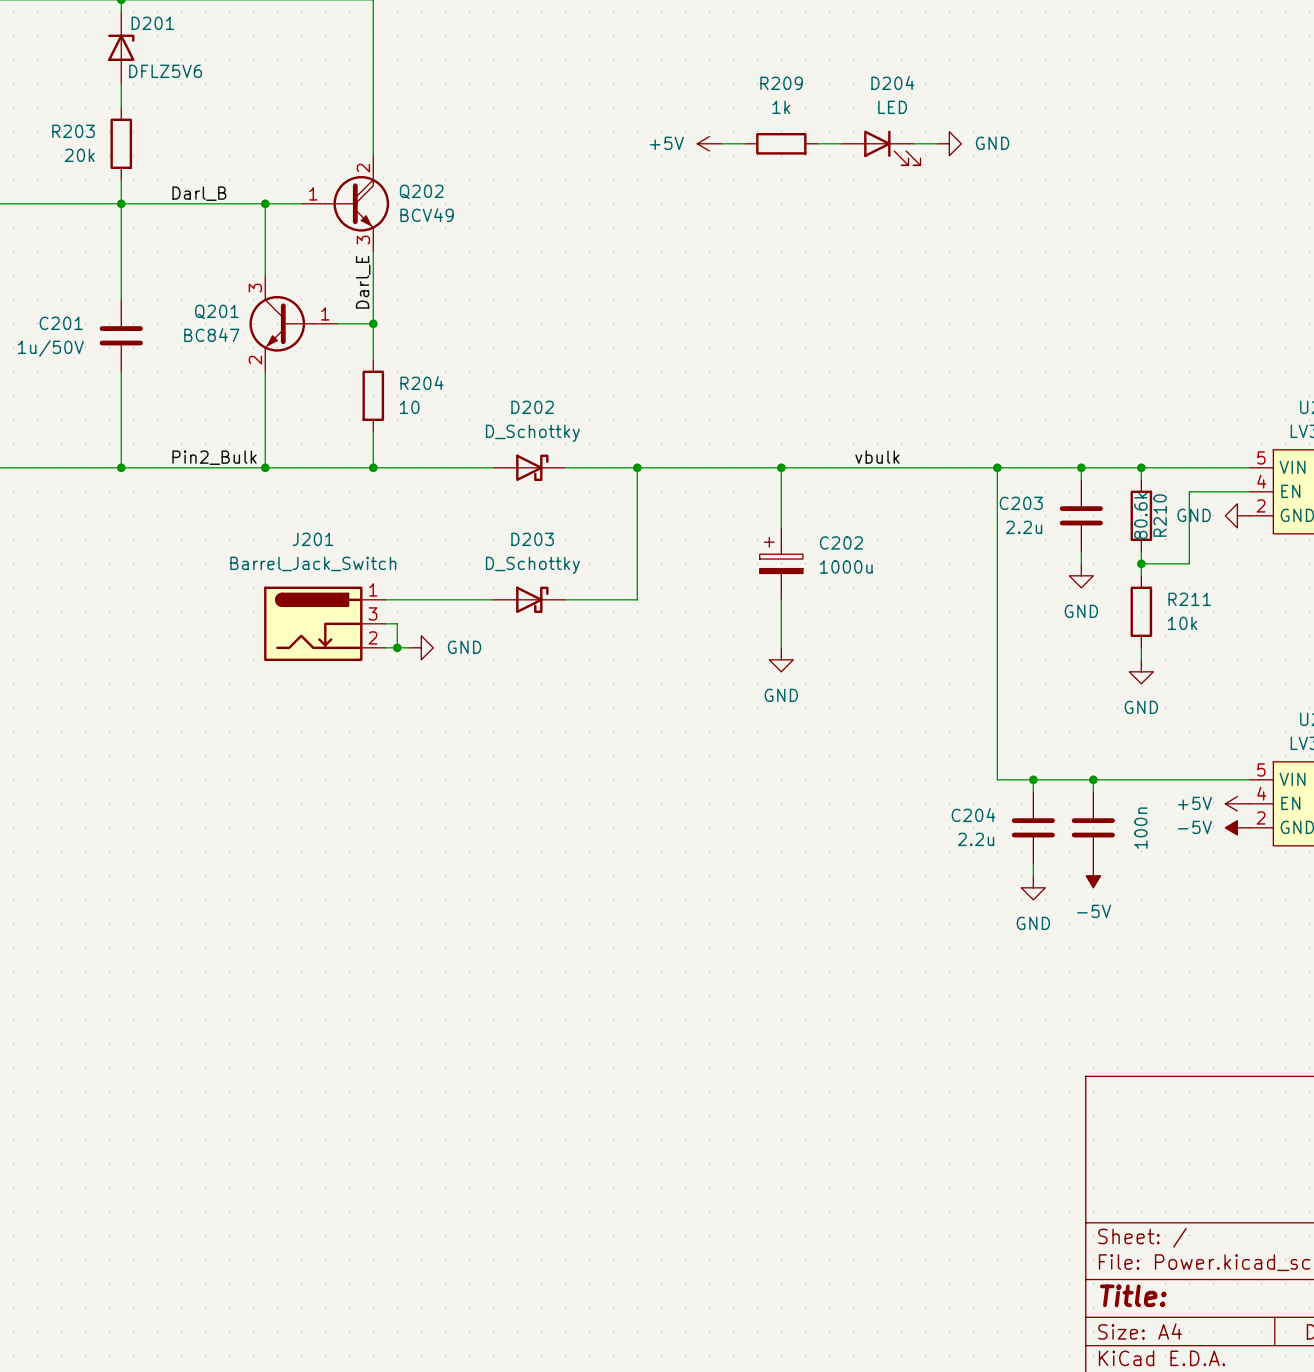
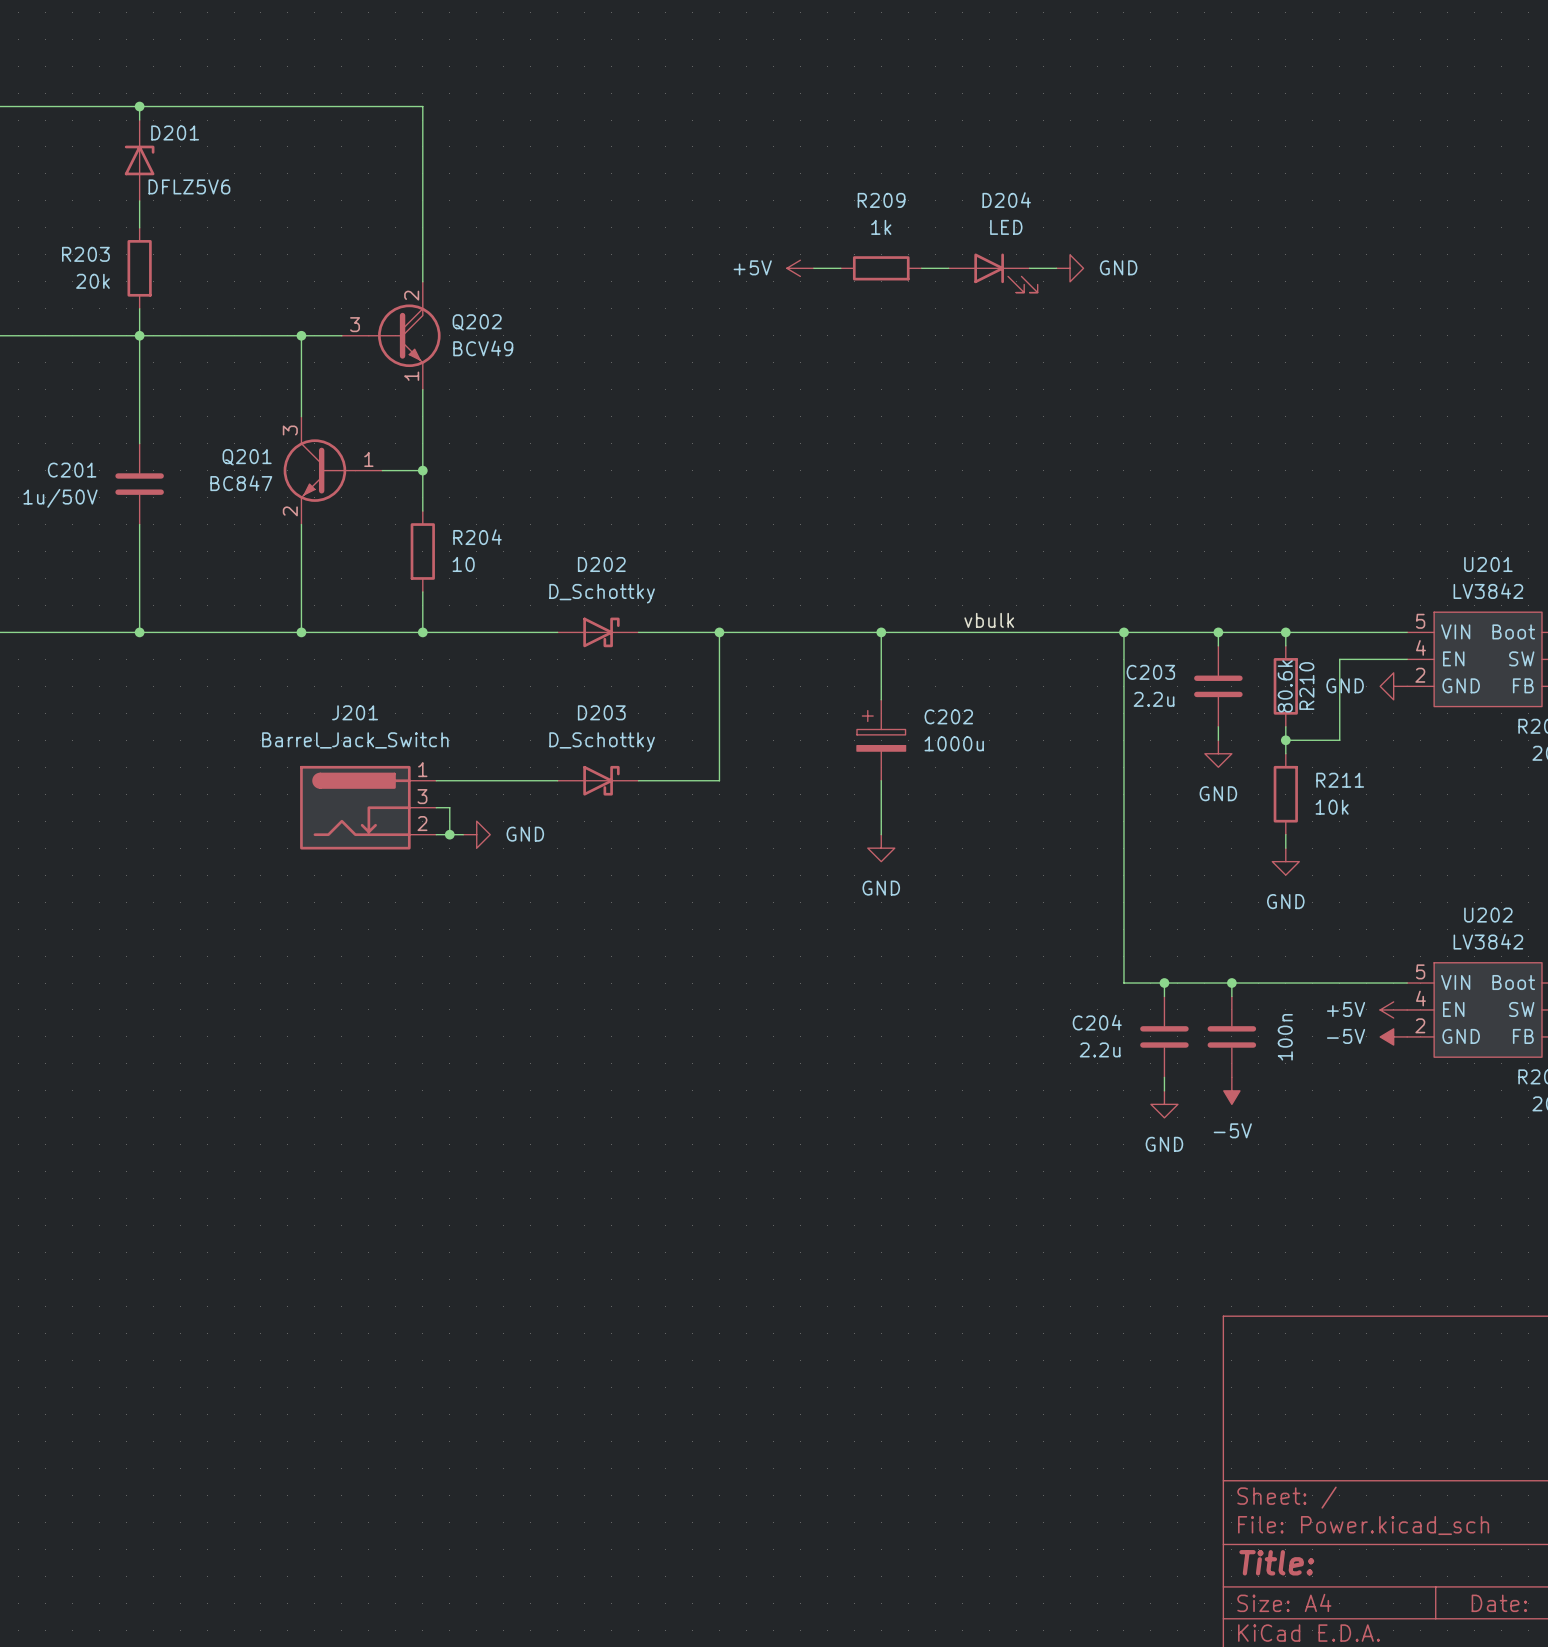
label: Darl_B (199, 193) -> none
Q202 pin number: 1 (313, 193) -> 3 (355, 324)
Q202 pin number: 3 (363, 240) -> 1 (411, 376)
label: Darl_E (363, 282) -> none
label: Pin2_Bulk (214, 457) -> none

